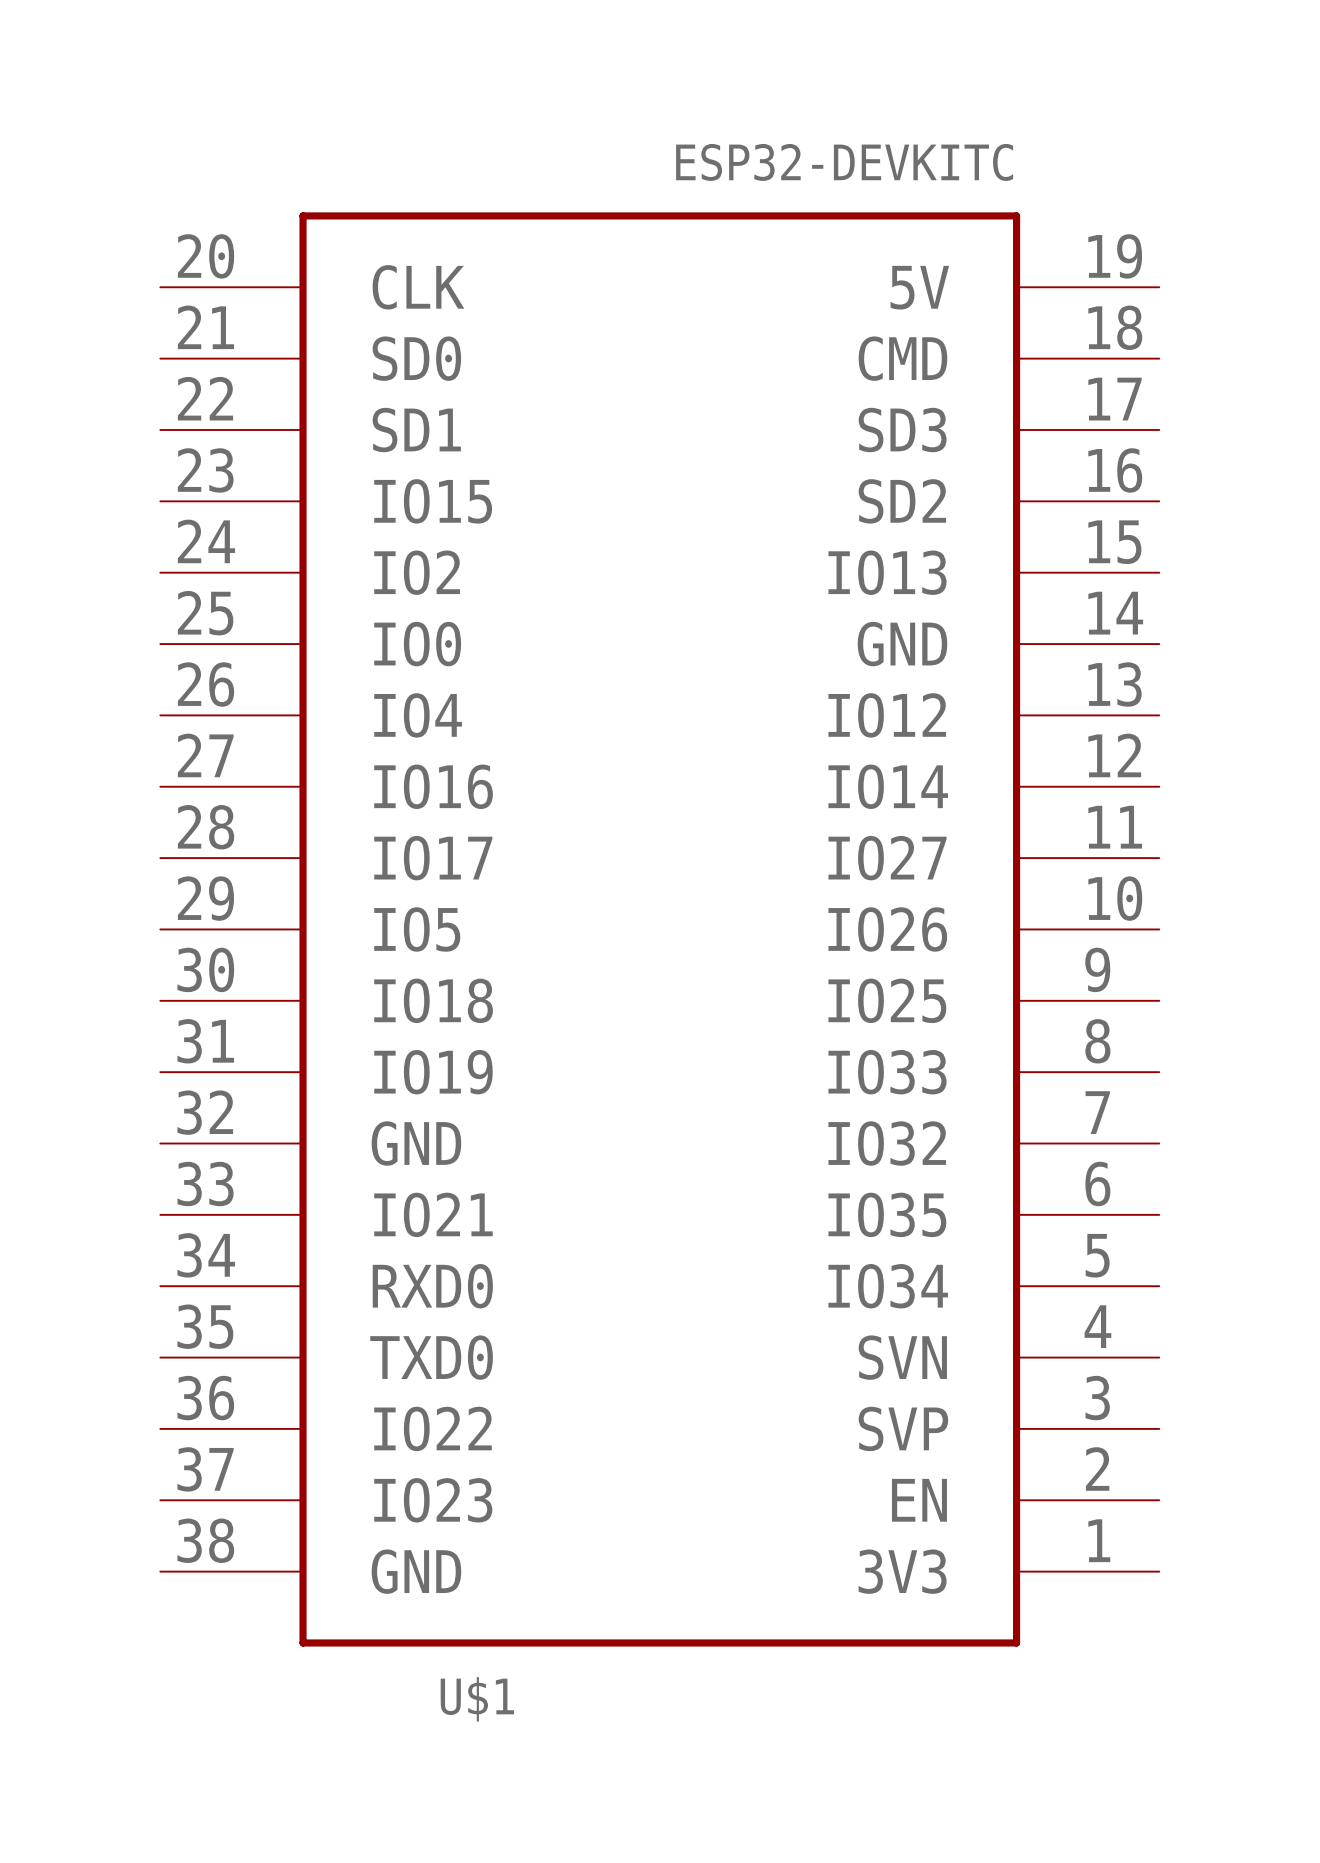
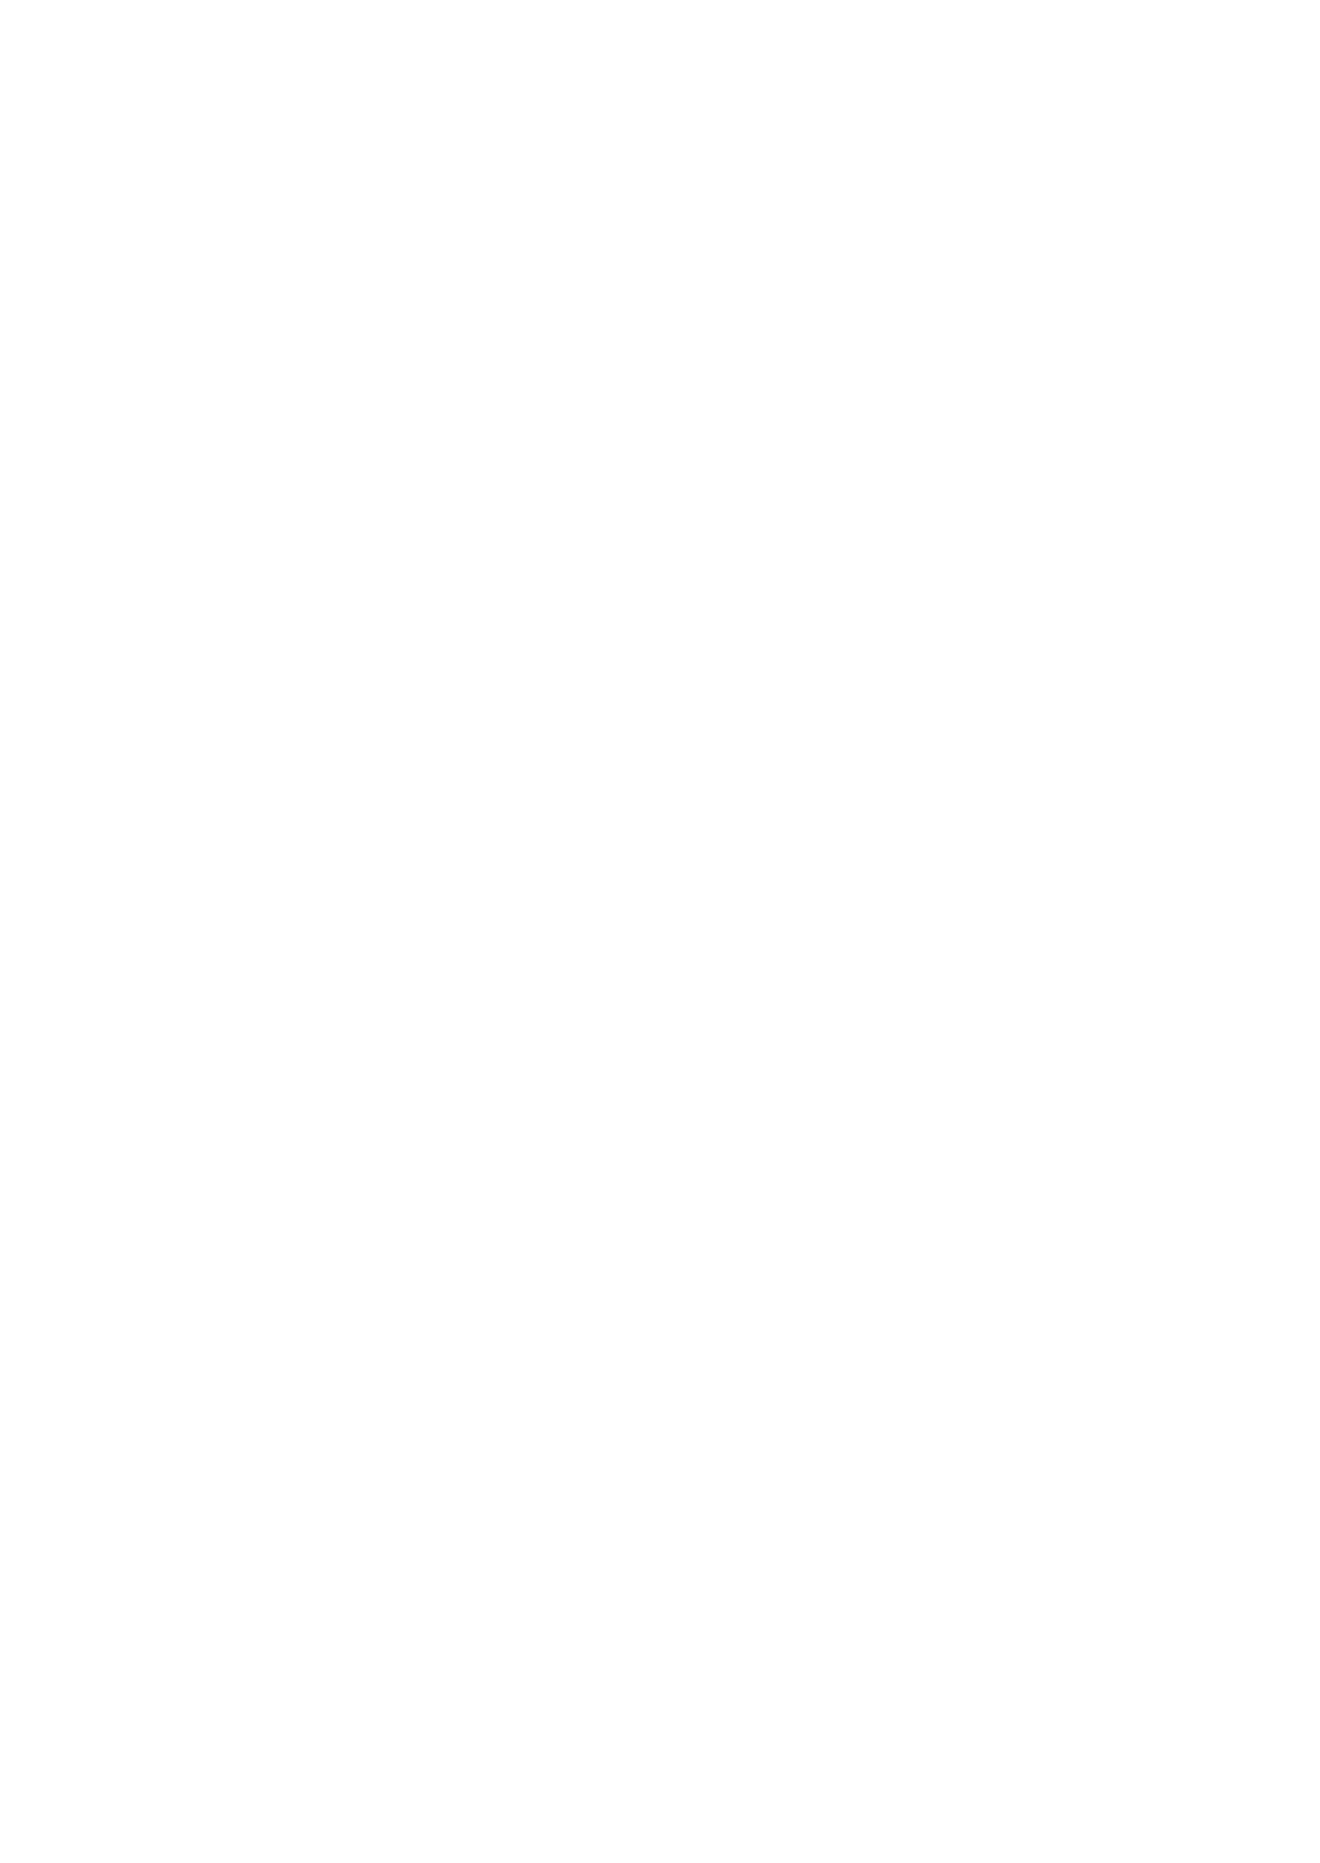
U$1: (659, 929) -> none

